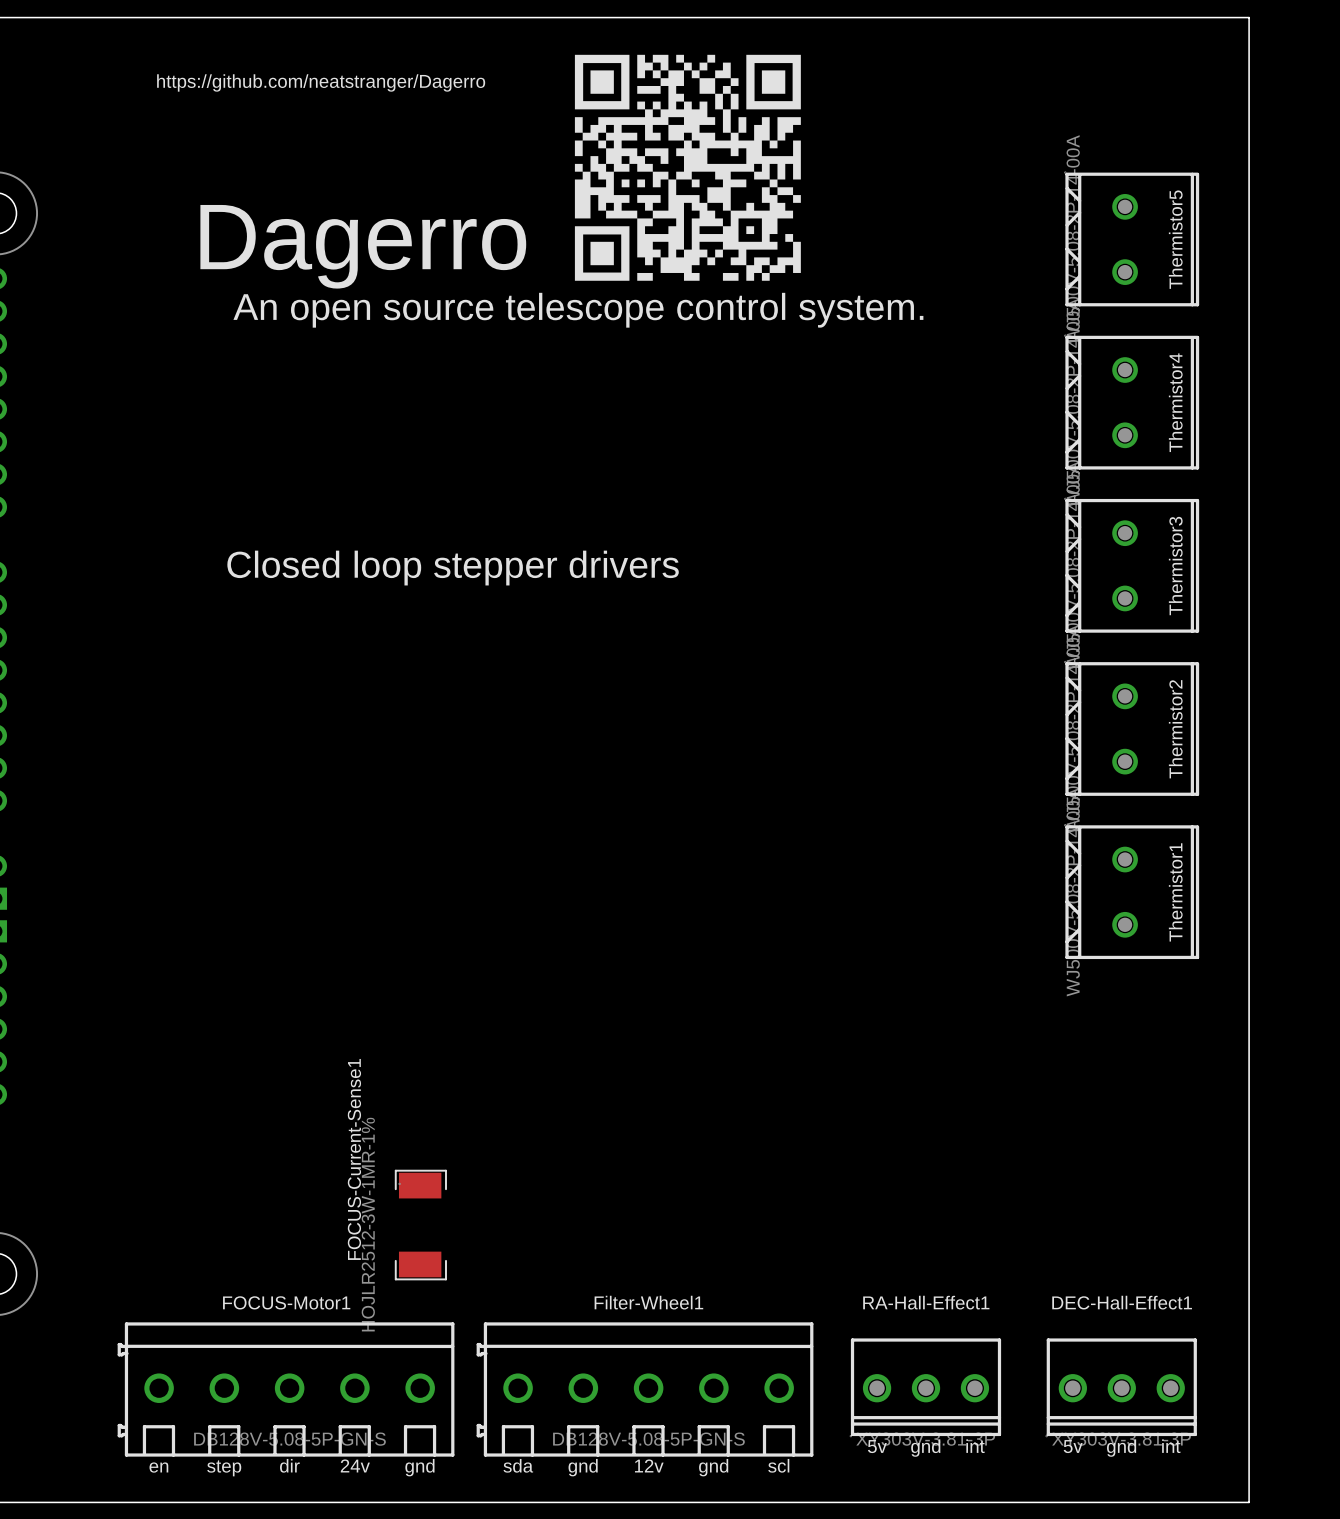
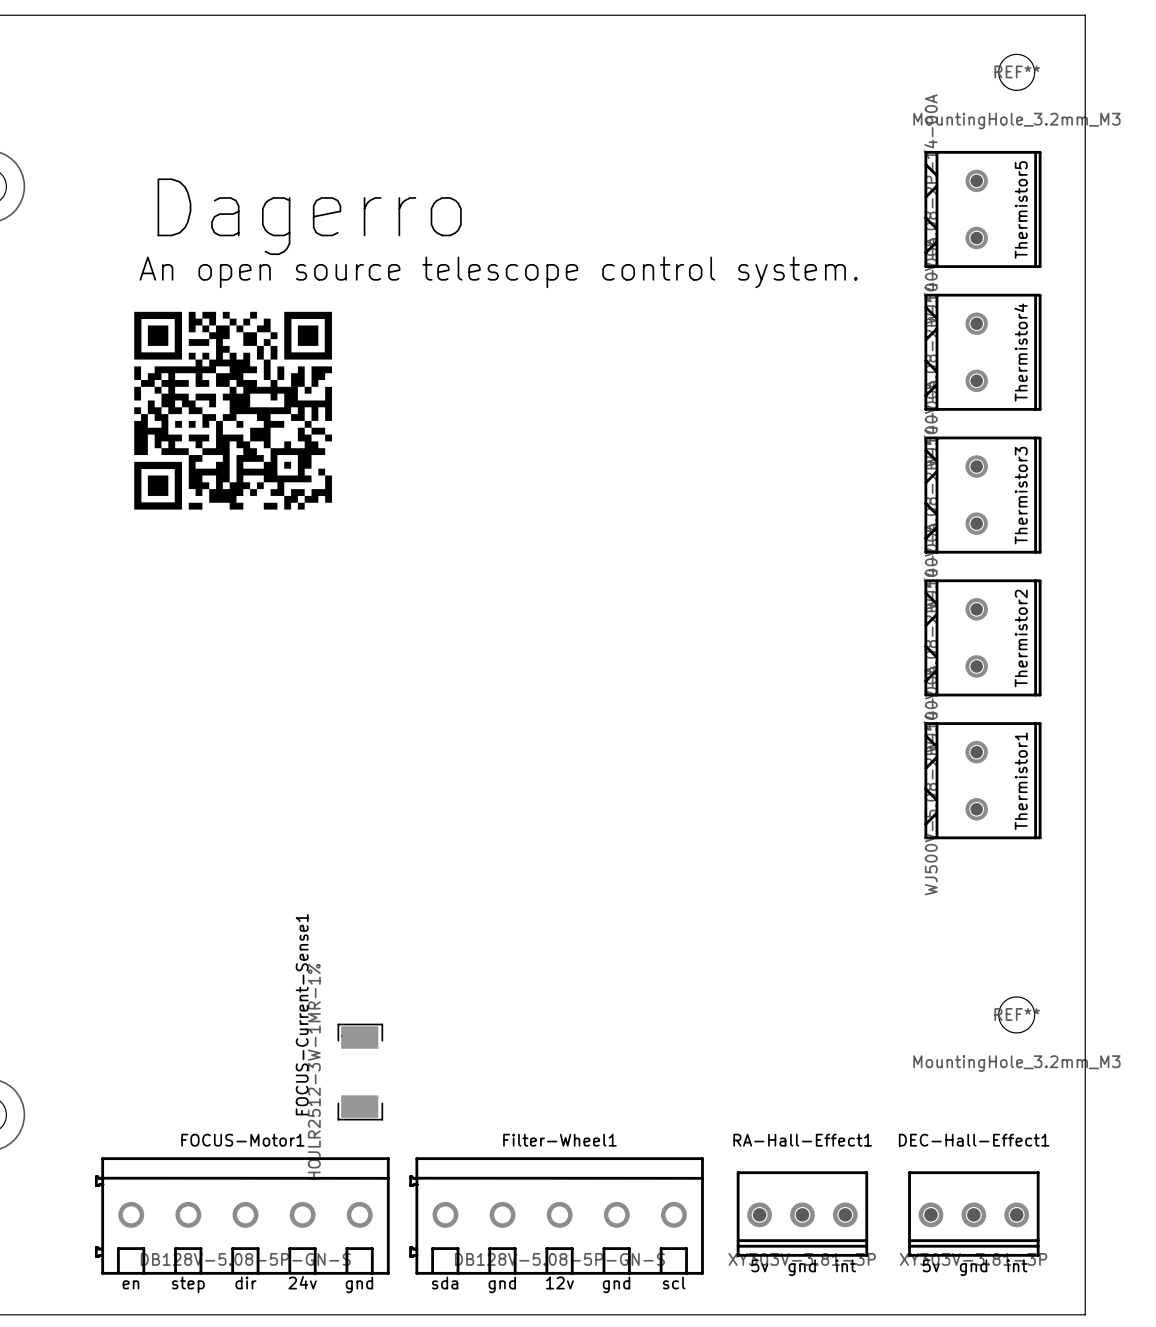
drawing: [574, 54, 801, 281] -> none
text: https://github.com/neatstranger/Dagerro (321, 82) -> none
REF**: none -> MountingHole_3.2mm_M3 (1016, 72)
drawing: none -> [134, 311, 332, 510]
text: Closed loop stepper drivers (453, 568) -> none
REF**: none -> MountingHole_3.2mm_M3 (1016, 1014)

